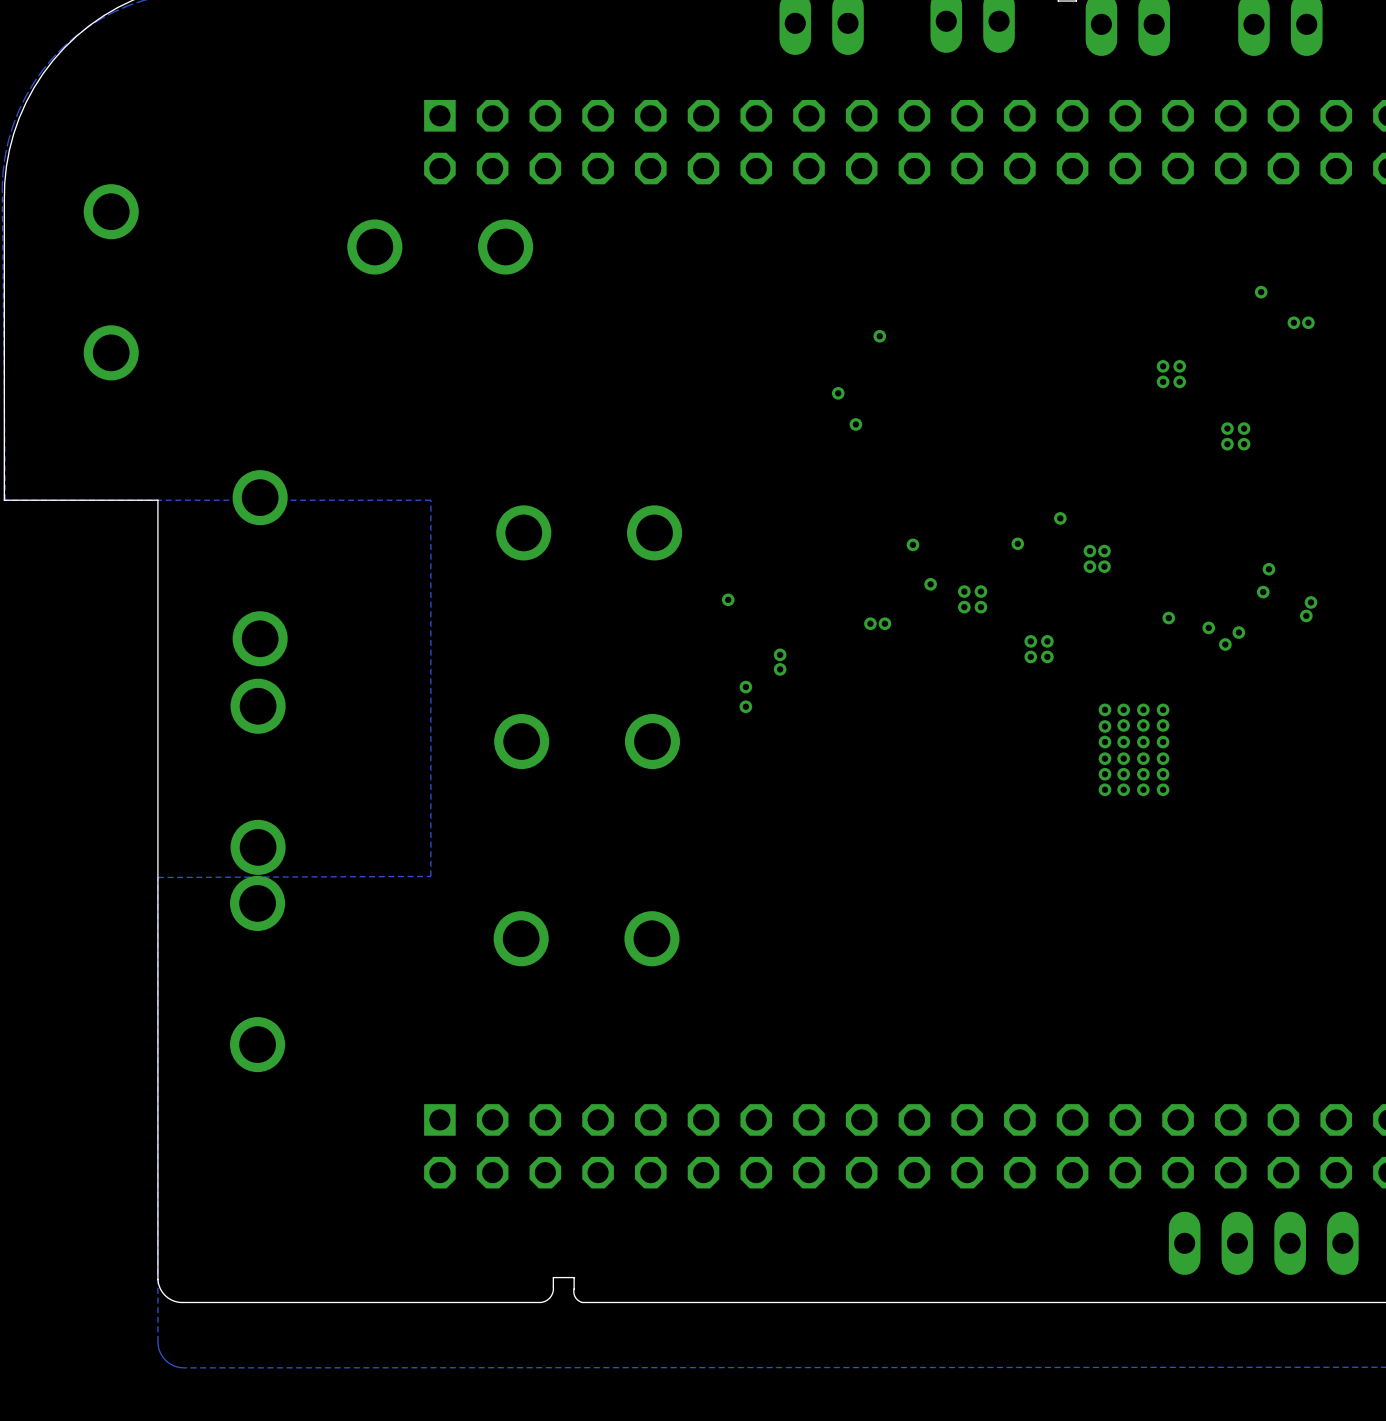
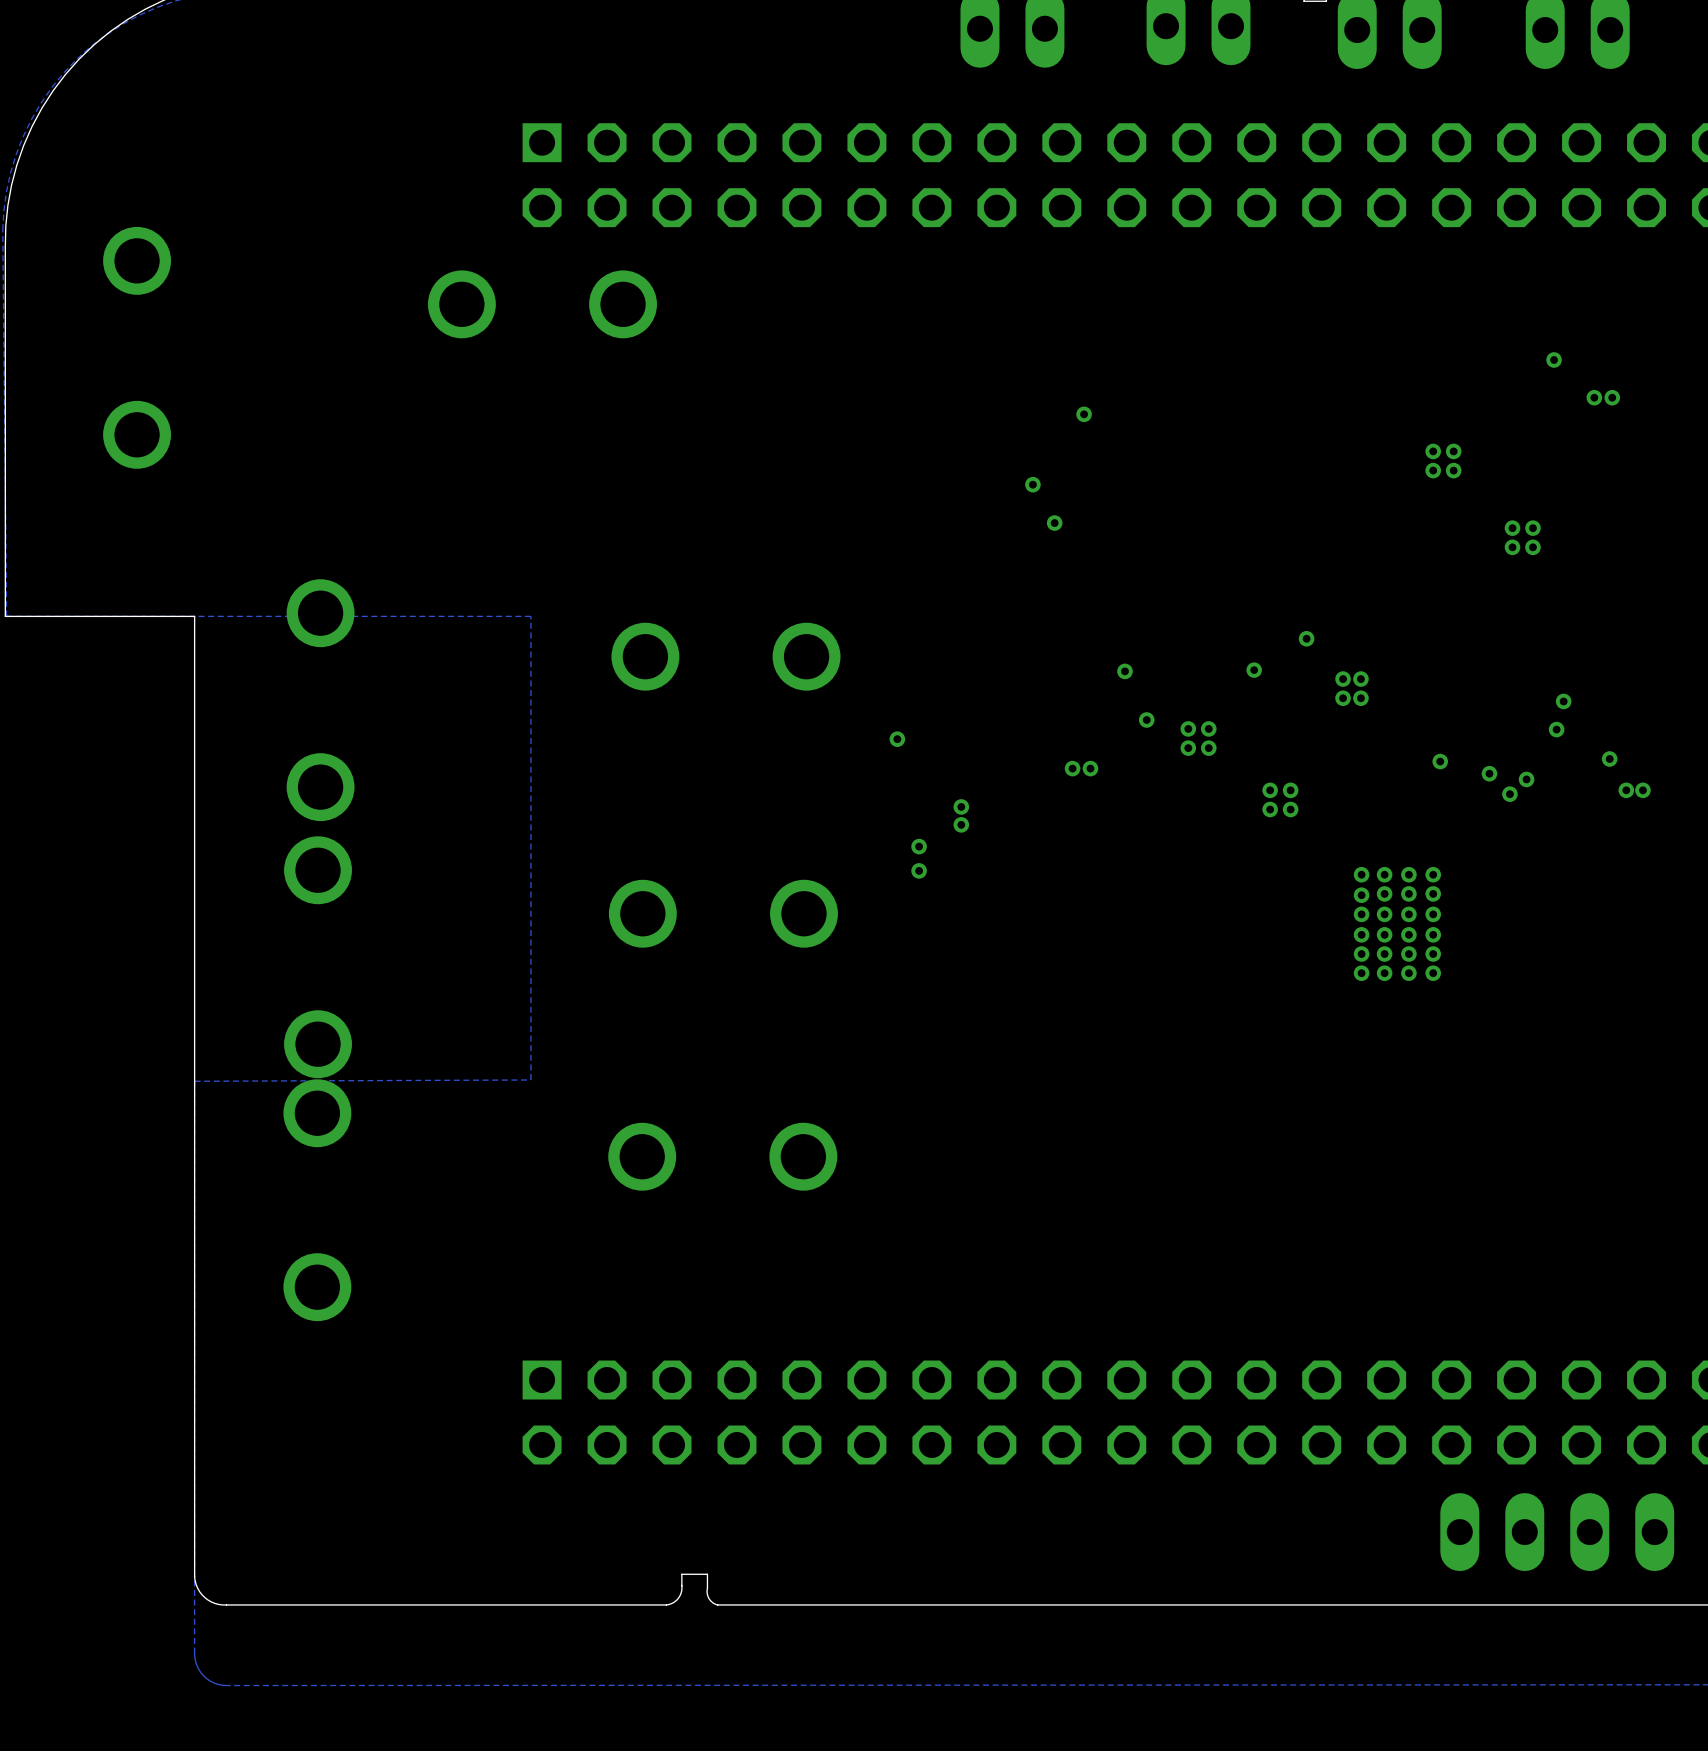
via: (1310, 602) -> none
via: none -> (1626, 790)
via: none -> (1642, 790)

